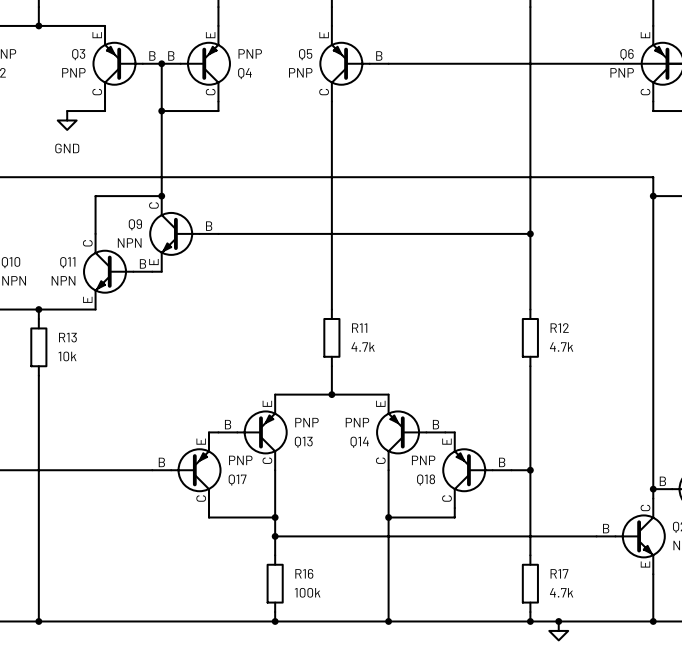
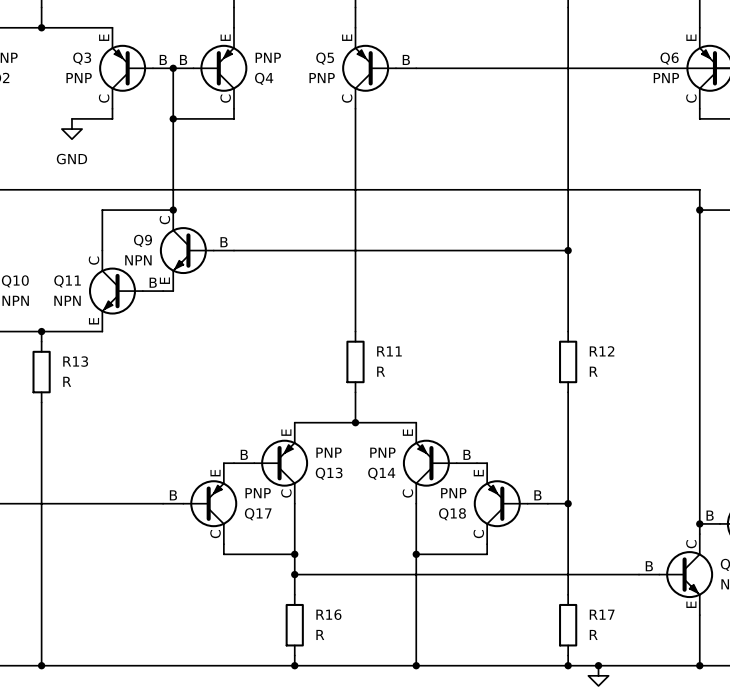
R11 value: 4.7k (363, 347) -> R (381, 371)
R12 value: 4.7k (561, 347) -> R (593, 371)
R13 value: 10k (67, 356) -> R (67, 381)
R16 value: 100k (307, 592) -> R (320, 634)
R17 value: 4.7k (561, 592) -> R (593, 634)

